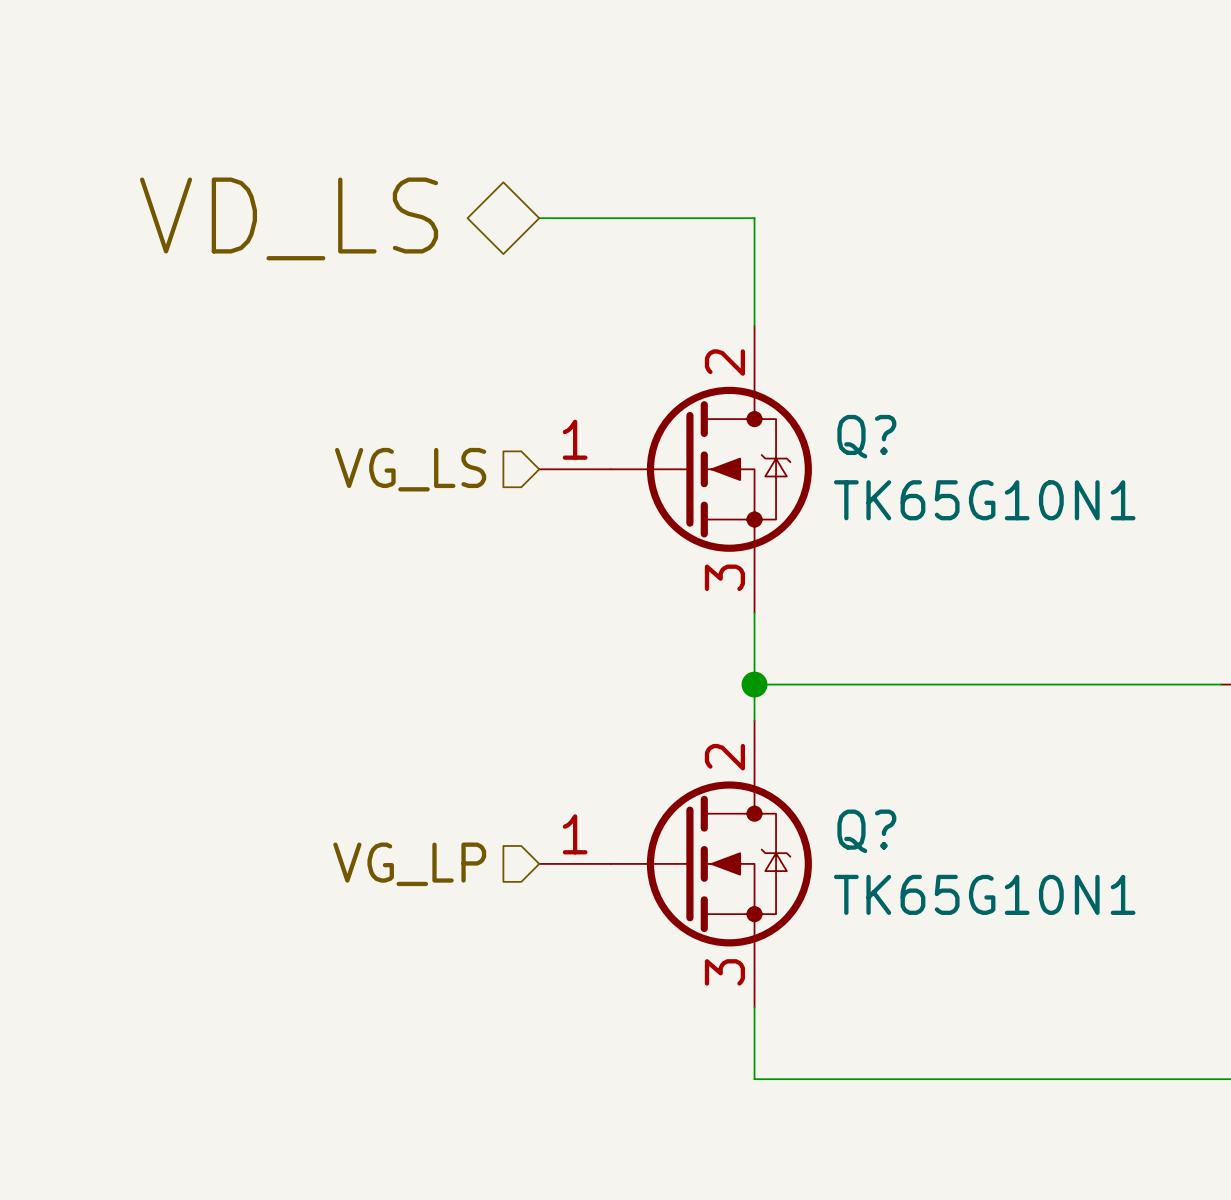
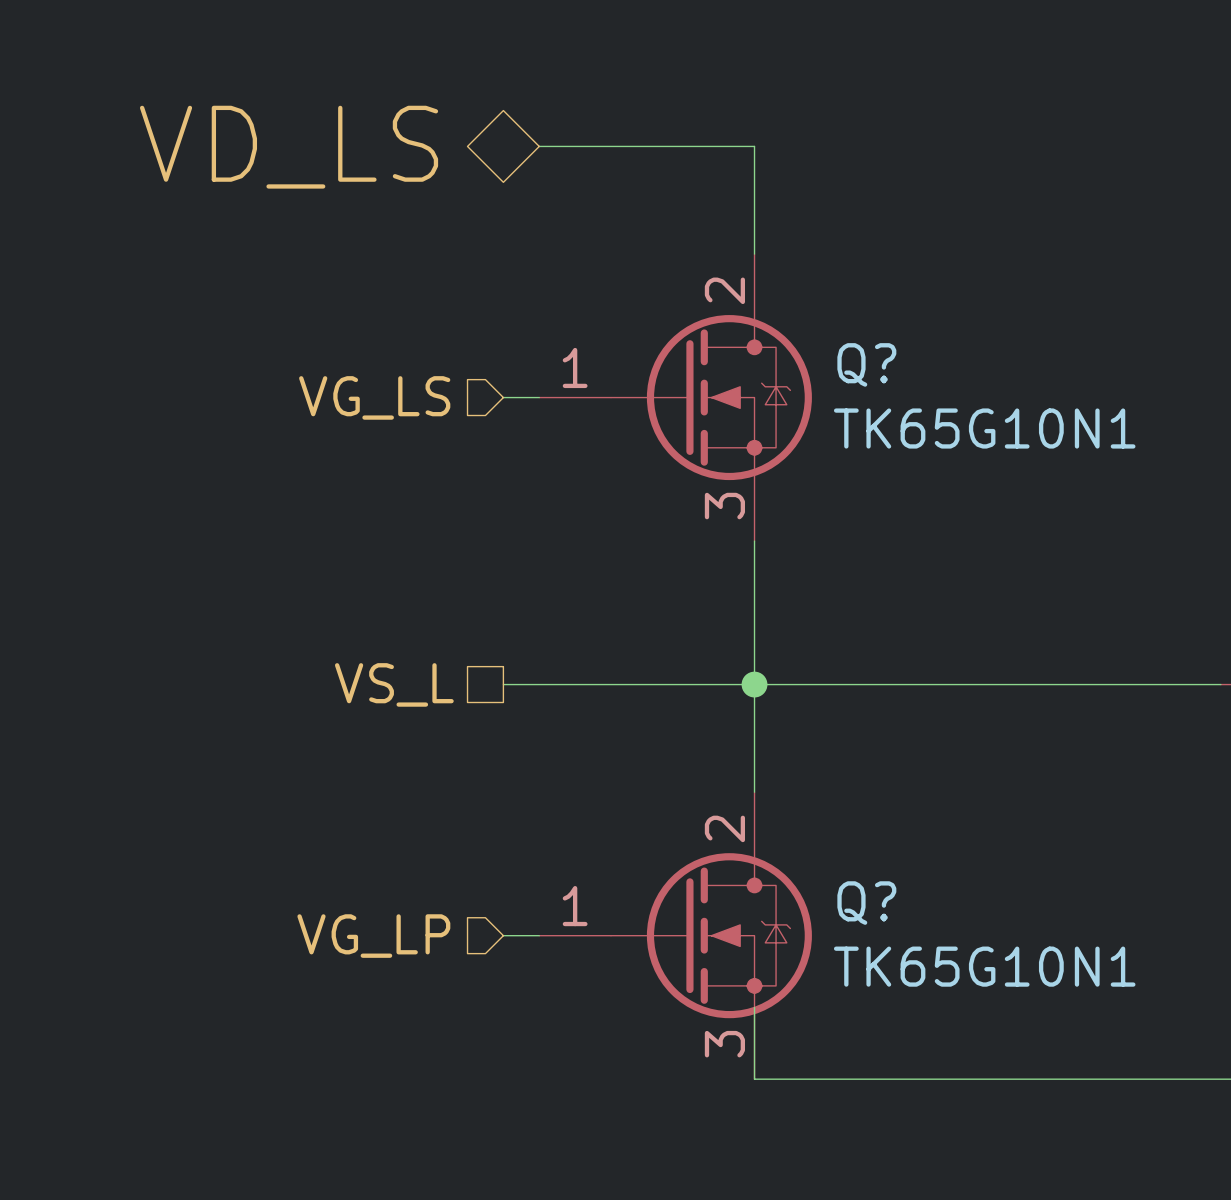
hierarchical label position: VD_LS (289, 218) -> VD_LS (289, 147)
wire: (539, 218) (754, 218) -> (539, 146) (754, 146) (754, 218)
wire: none -> (503, 397) (539, 397)
hierarchical label position: VG_LS (410, 469) -> VG_LS (374, 397)
Q? position: (675, 469) -> (675, 397)
hierarchical label: none -> VS_L (394, 684)
wire: none -> (503, 684) (754, 684)
Q? position: (675, 863) -> (675, 935)
hierarchical label position: VG_LP (409, 864) -> VG_LP (373, 936)
wire: none -> (503, 935) (539, 935)

